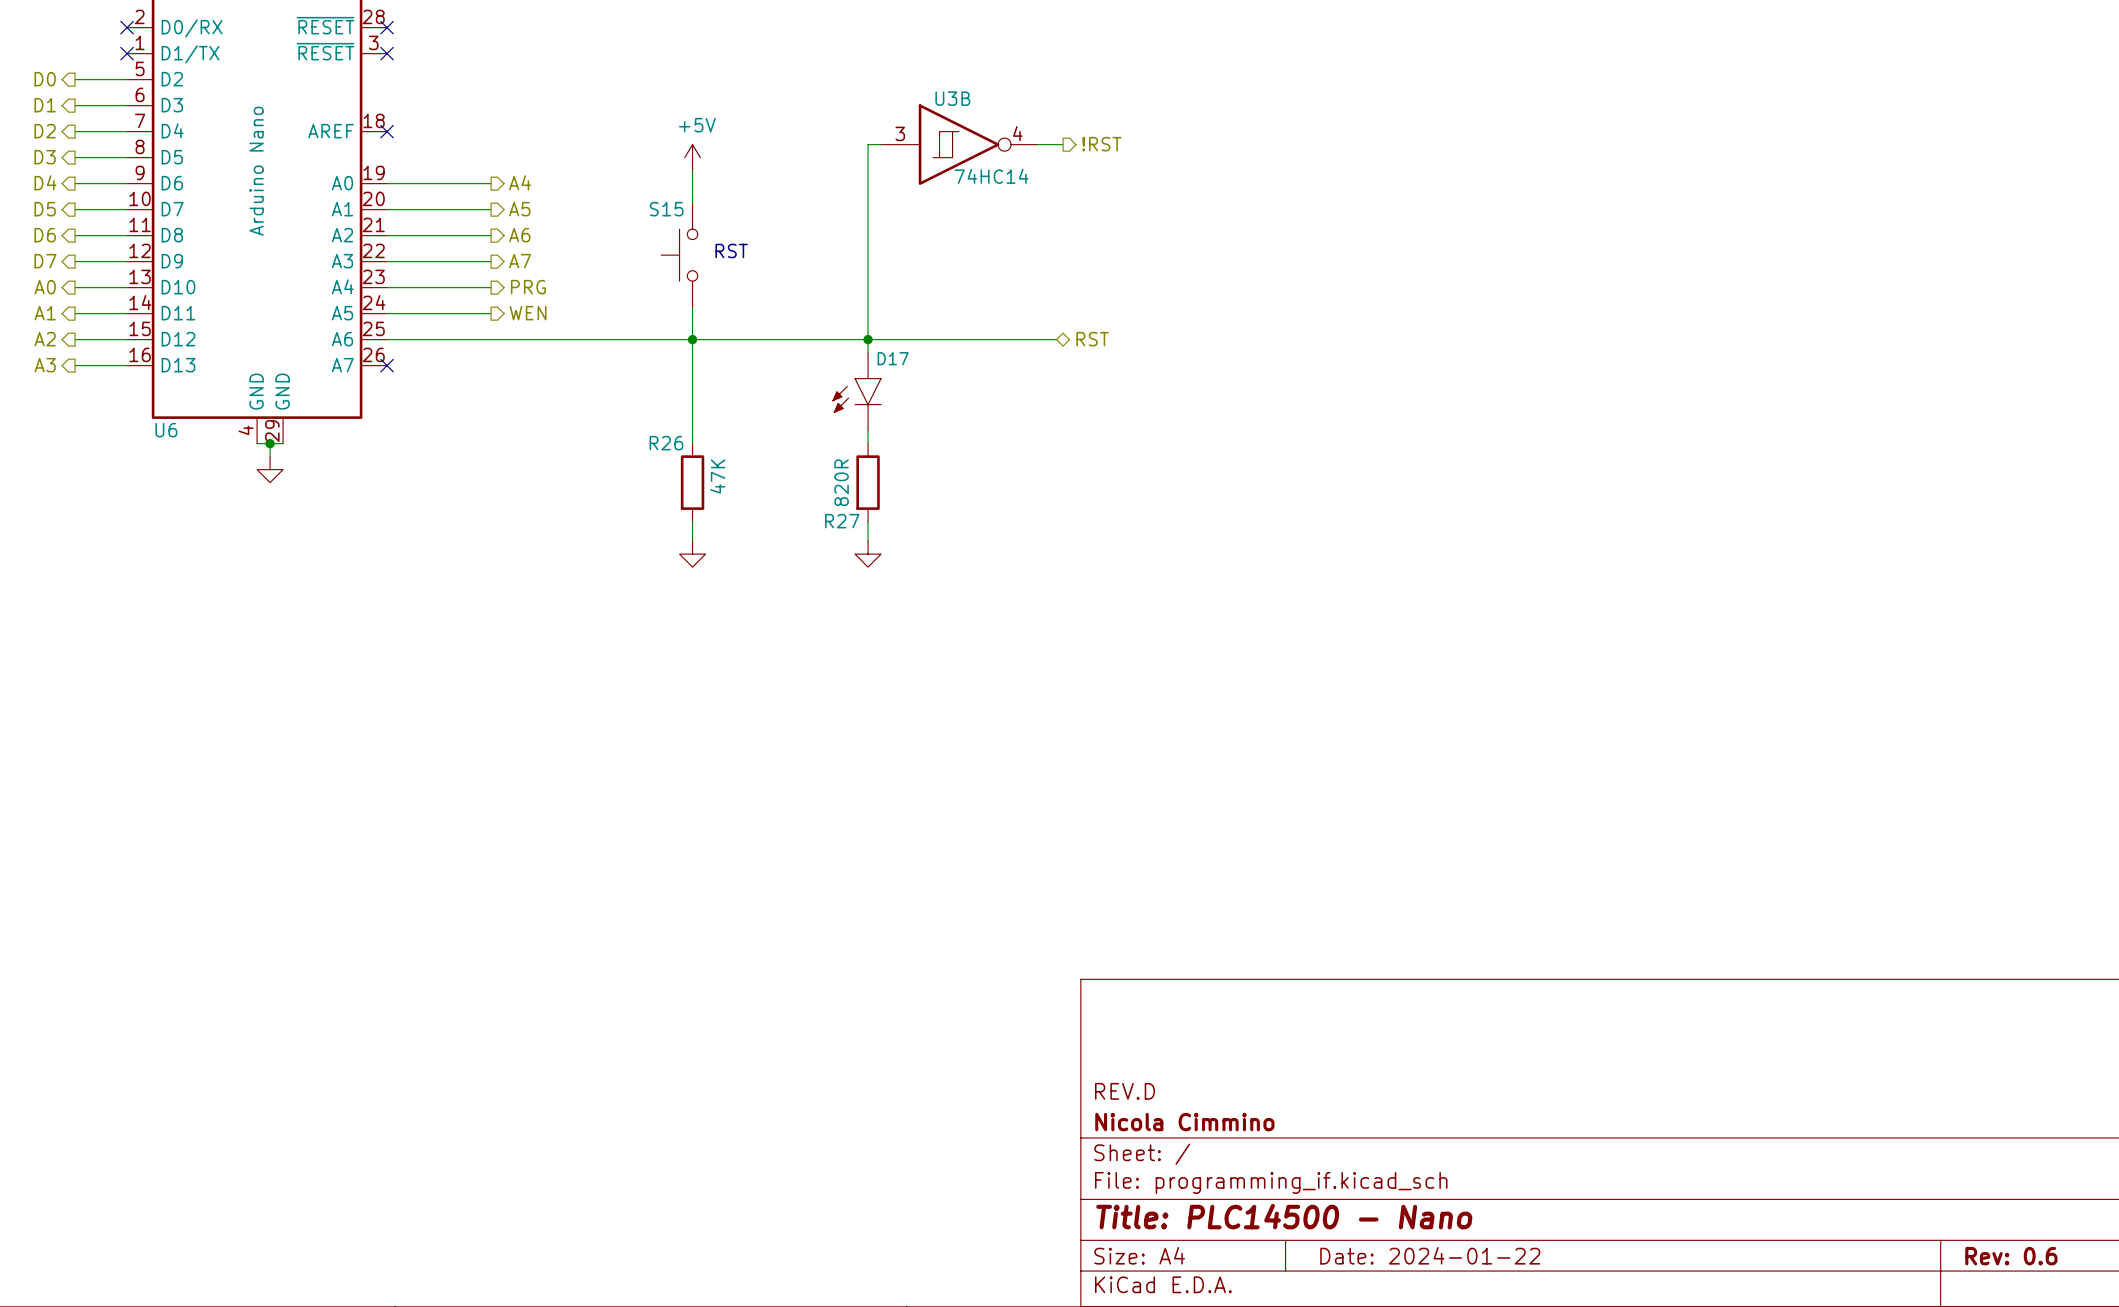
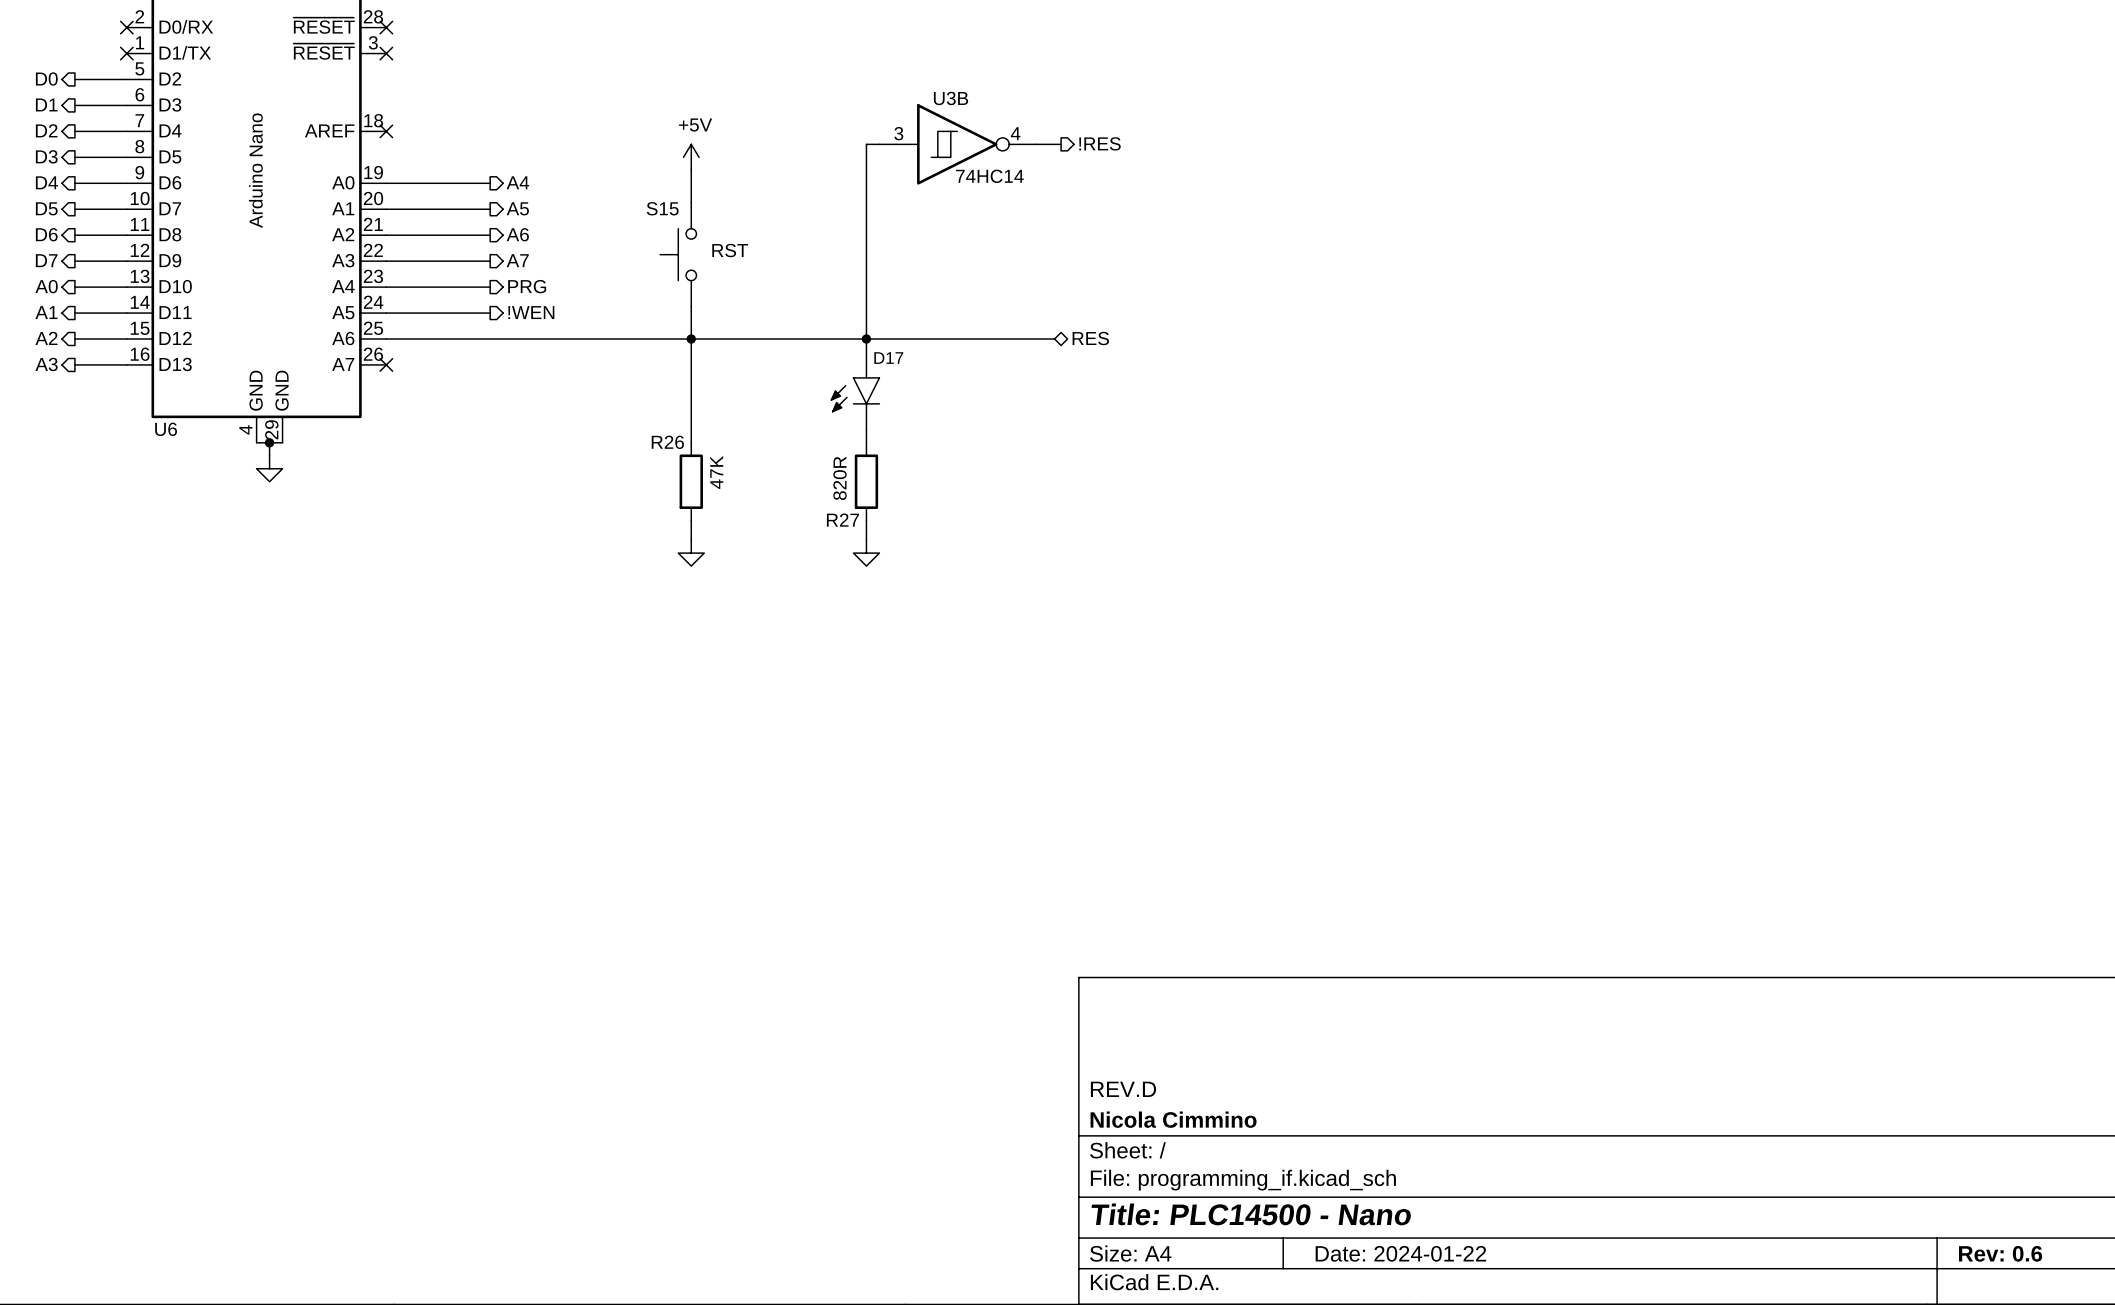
hierarchical label: !RST (1101, 144) -> !RES (1099, 143)
hierarchical label: WEN (528, 313) -> !WEN (531, 312)
hierarchical label: RST (1092, 339) -> RES (1090, 338)

